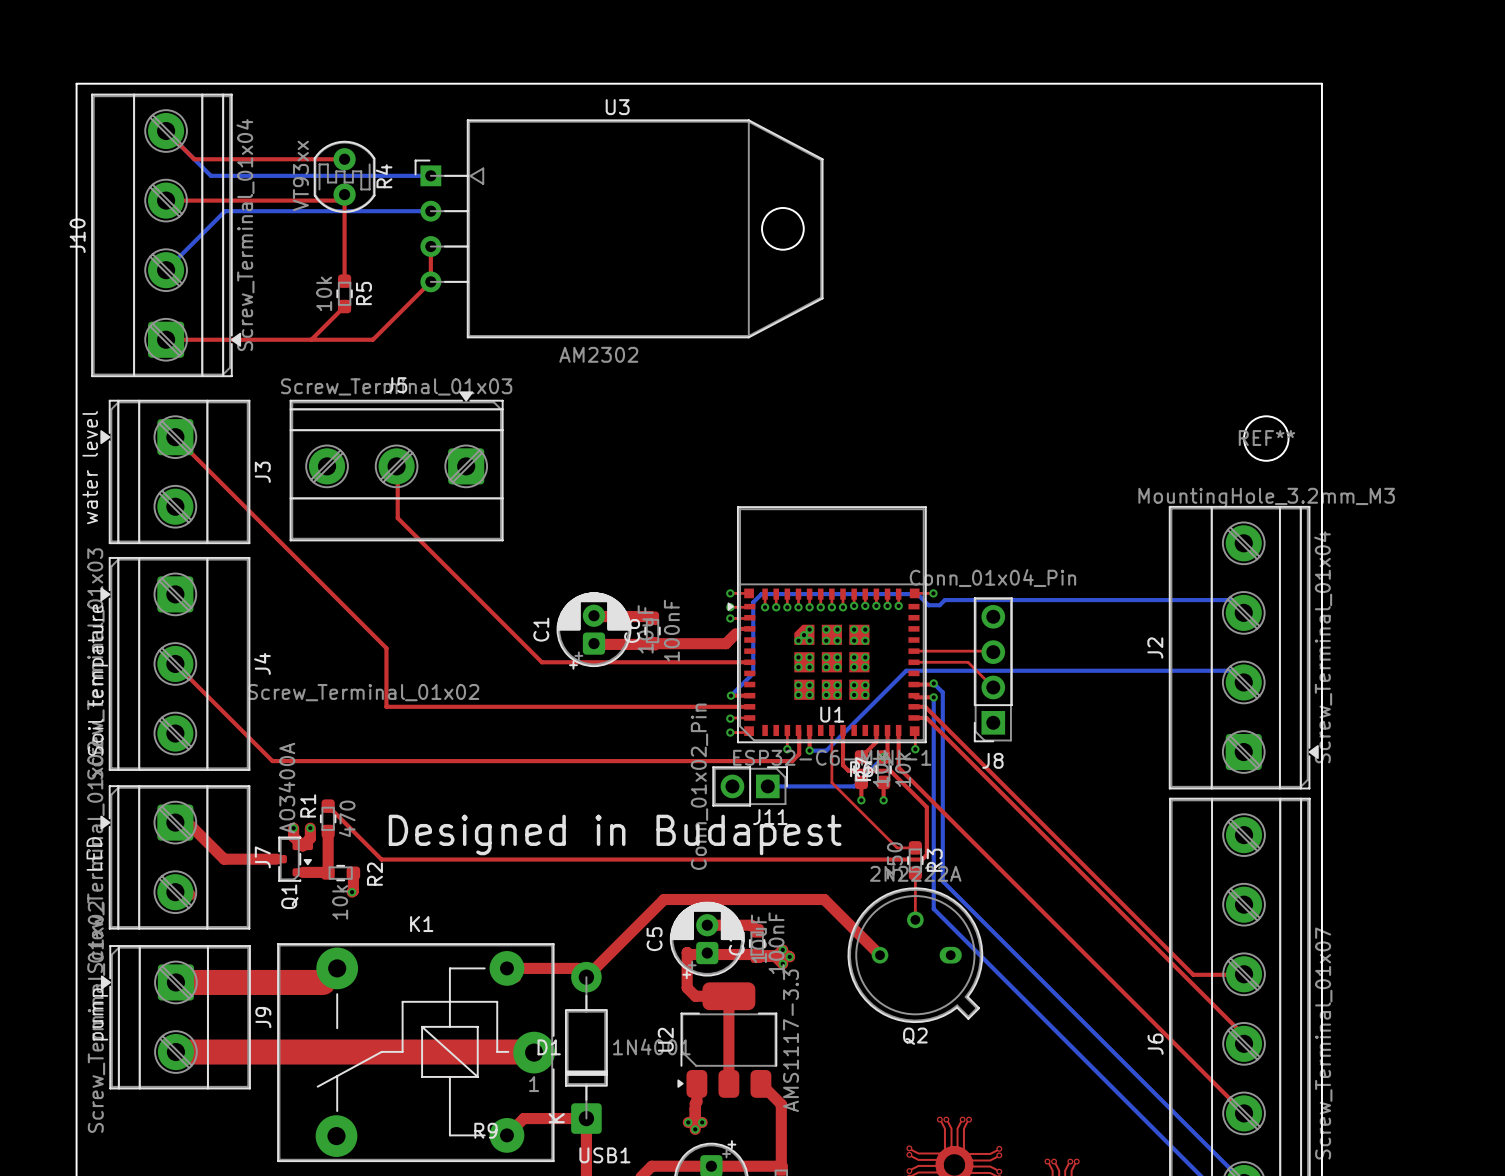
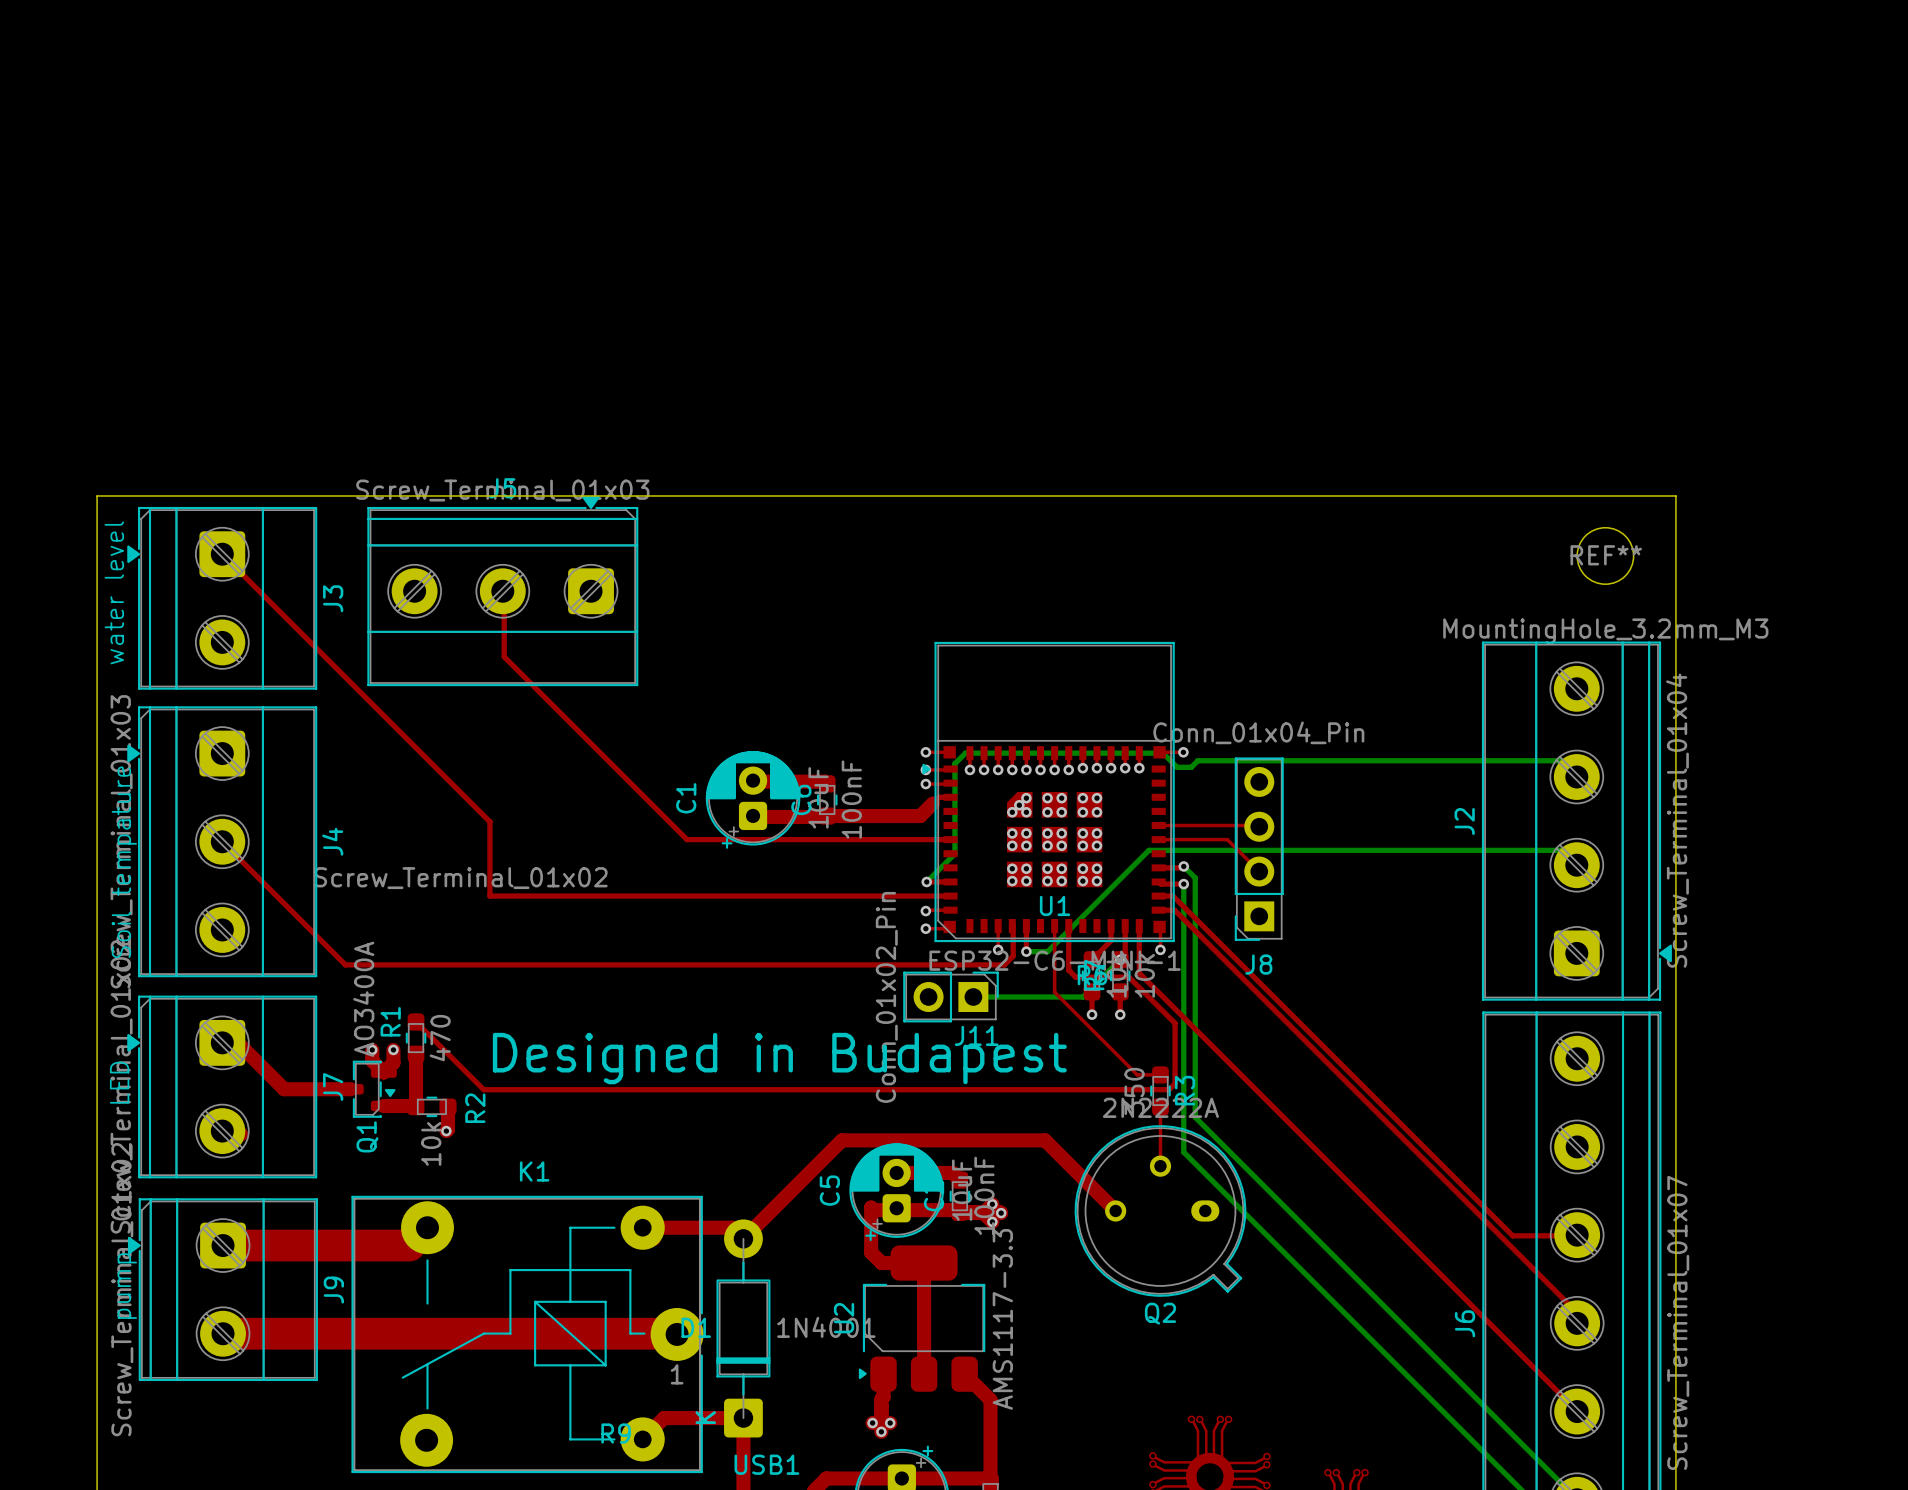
top track: (166, 131) (194, 159) (344, 159) -> none
bottom track: (166, 131) (210, 175) (430, 175) -> none
R4: VT93xx (344, 176) -> none
top track: (166, 200) (338, 200) (344, 194) (344, 281) -> none
bottom track: (430, 211) (225, 211) (166, 270) -> none
U3: AM2302 (619, 228) -> none
J10: Screw_Terminal_01x04 (166, 235) -> none
top track: (430, 246) (430, 281) (372, 339) (166, 339) -> none
R5: 10k (344, 293) -> none
top track: (344, 306) (311, 339) -> none
board edge: (76, 391) (76, 83) (1321, 83) (1321, 391) -> (97, 496) (1675, 496)

